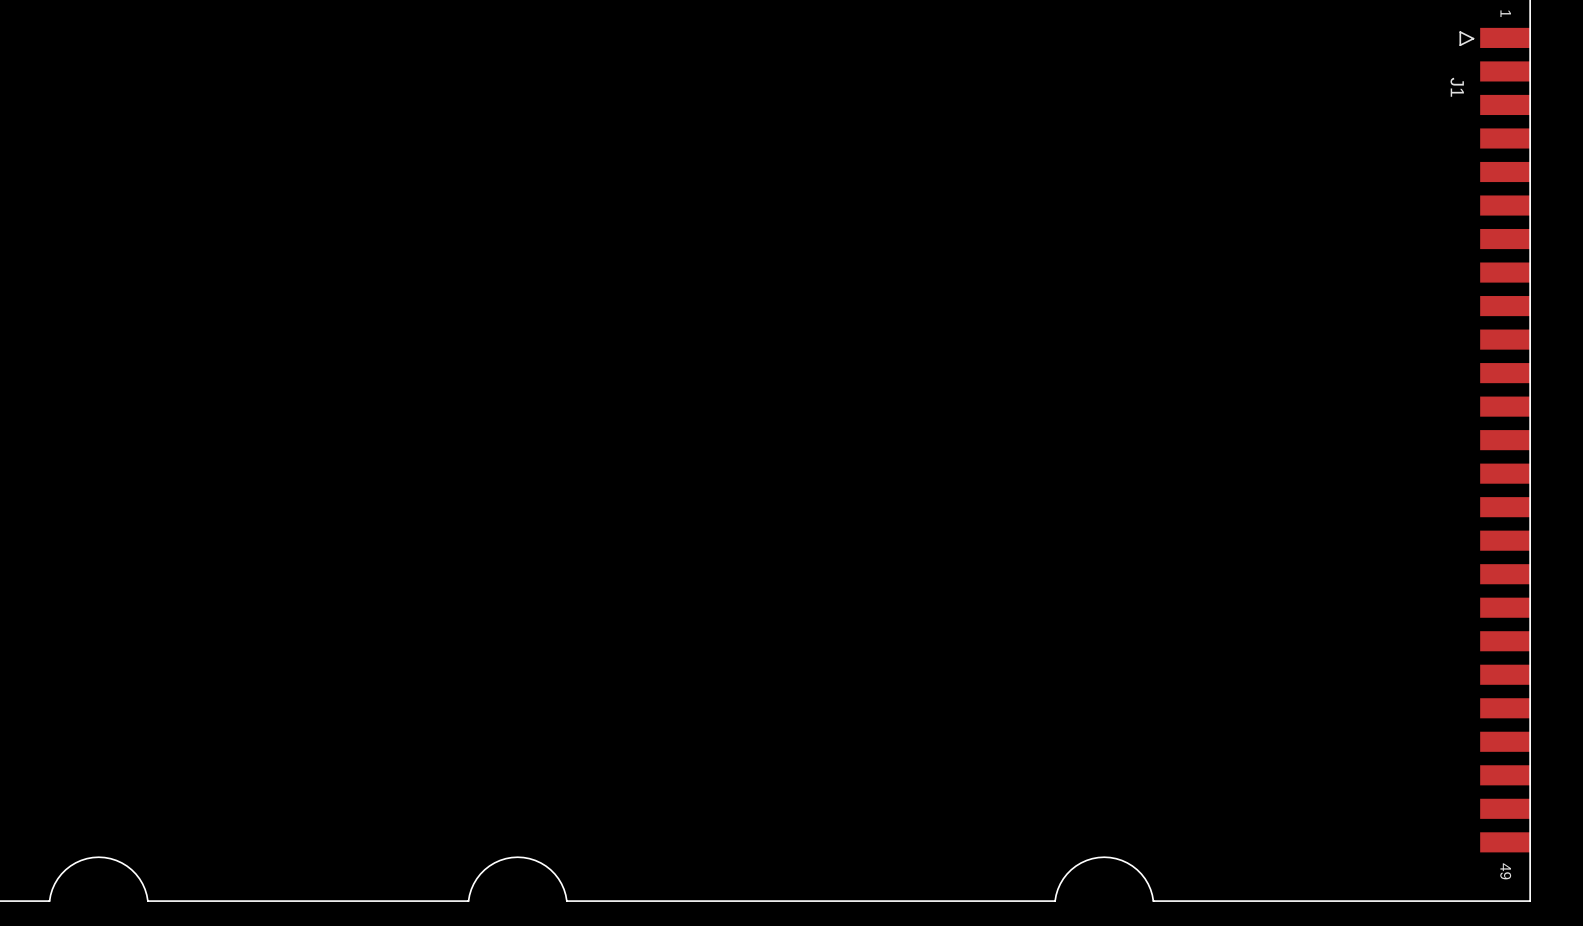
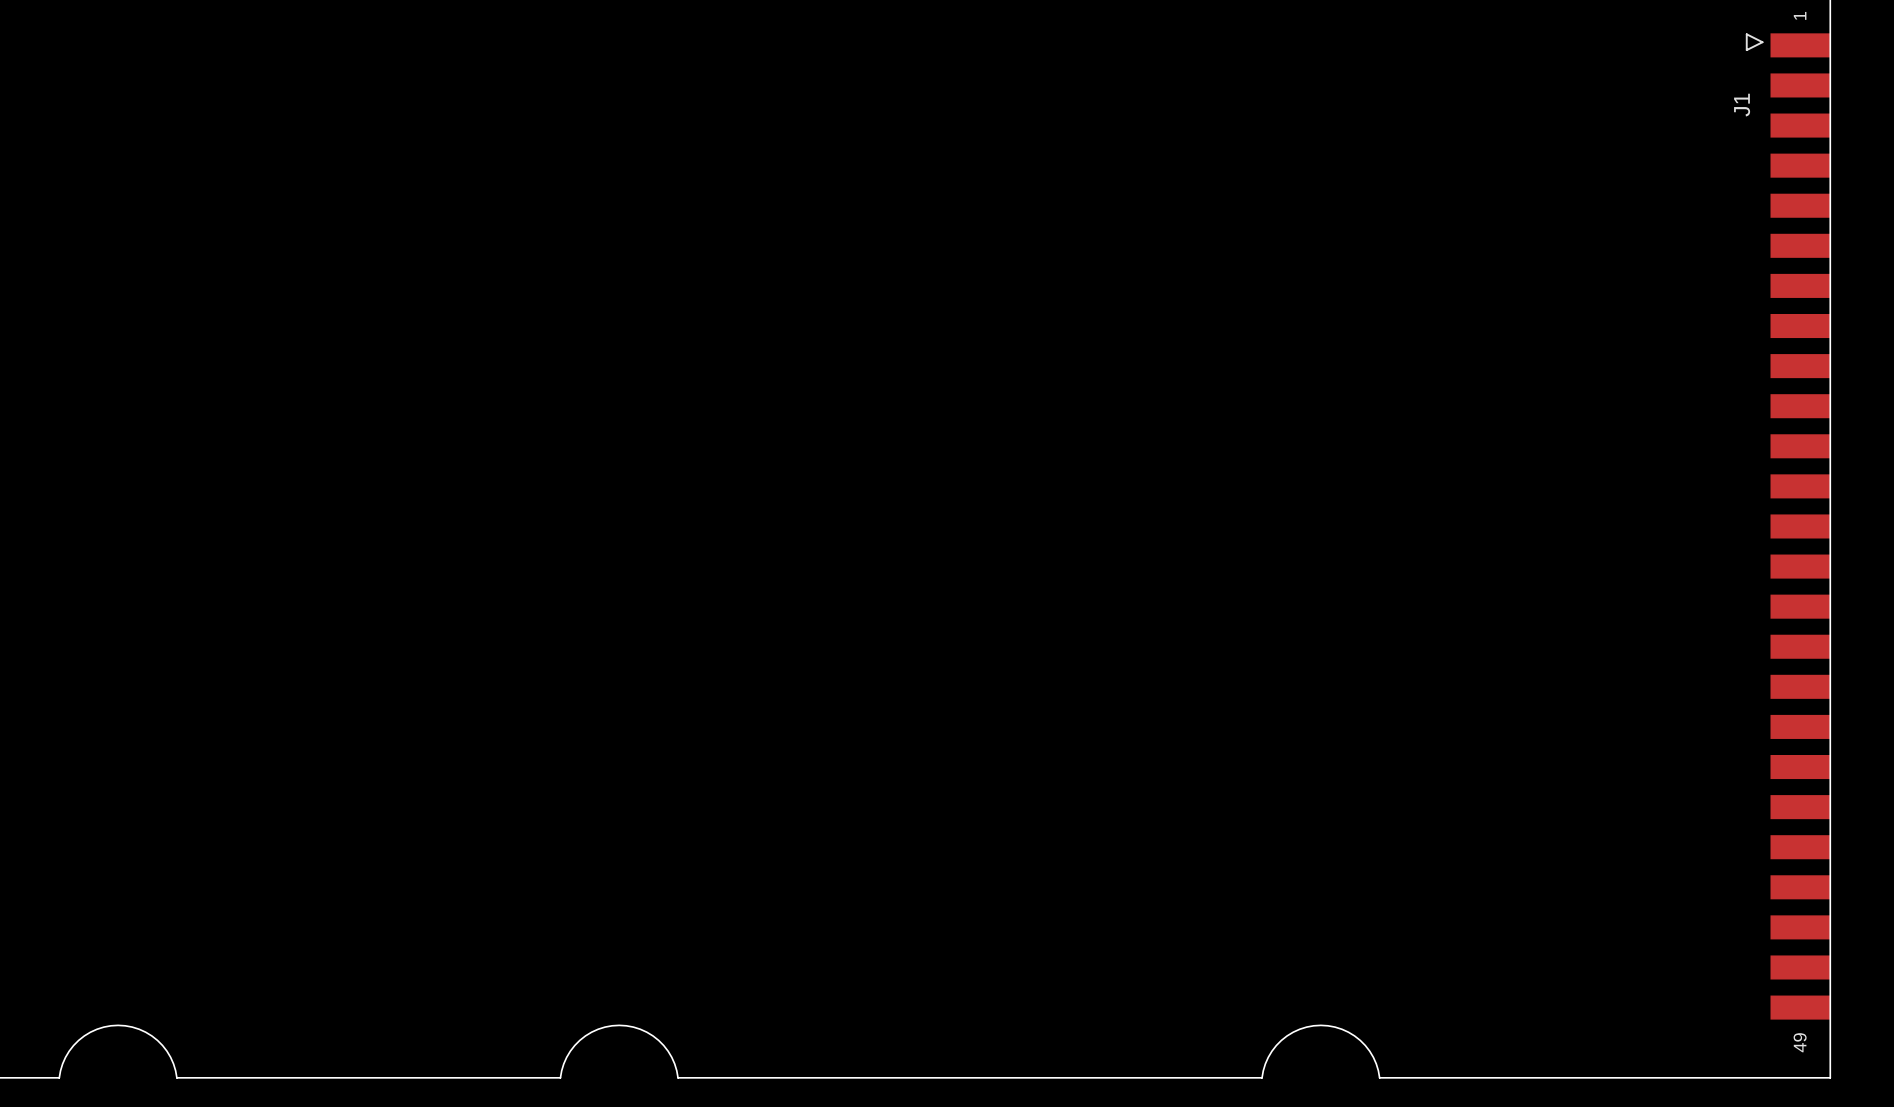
J1 footprint: [1459, 27, 1531, 853] -> [1745, 33, 1831, 1020]

